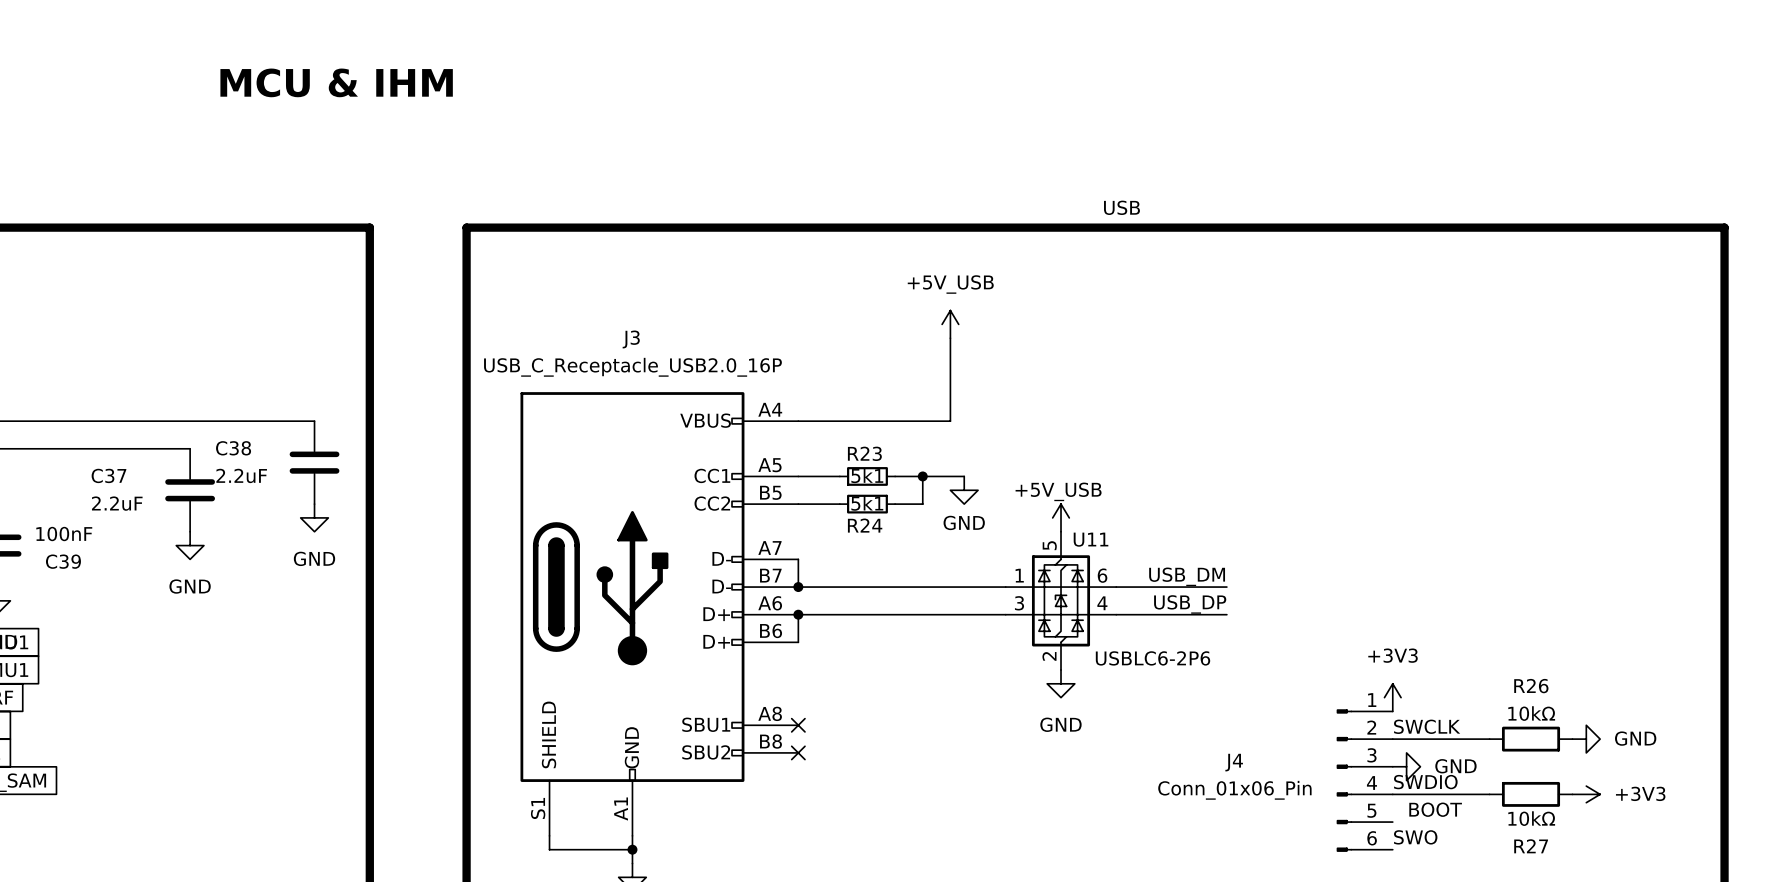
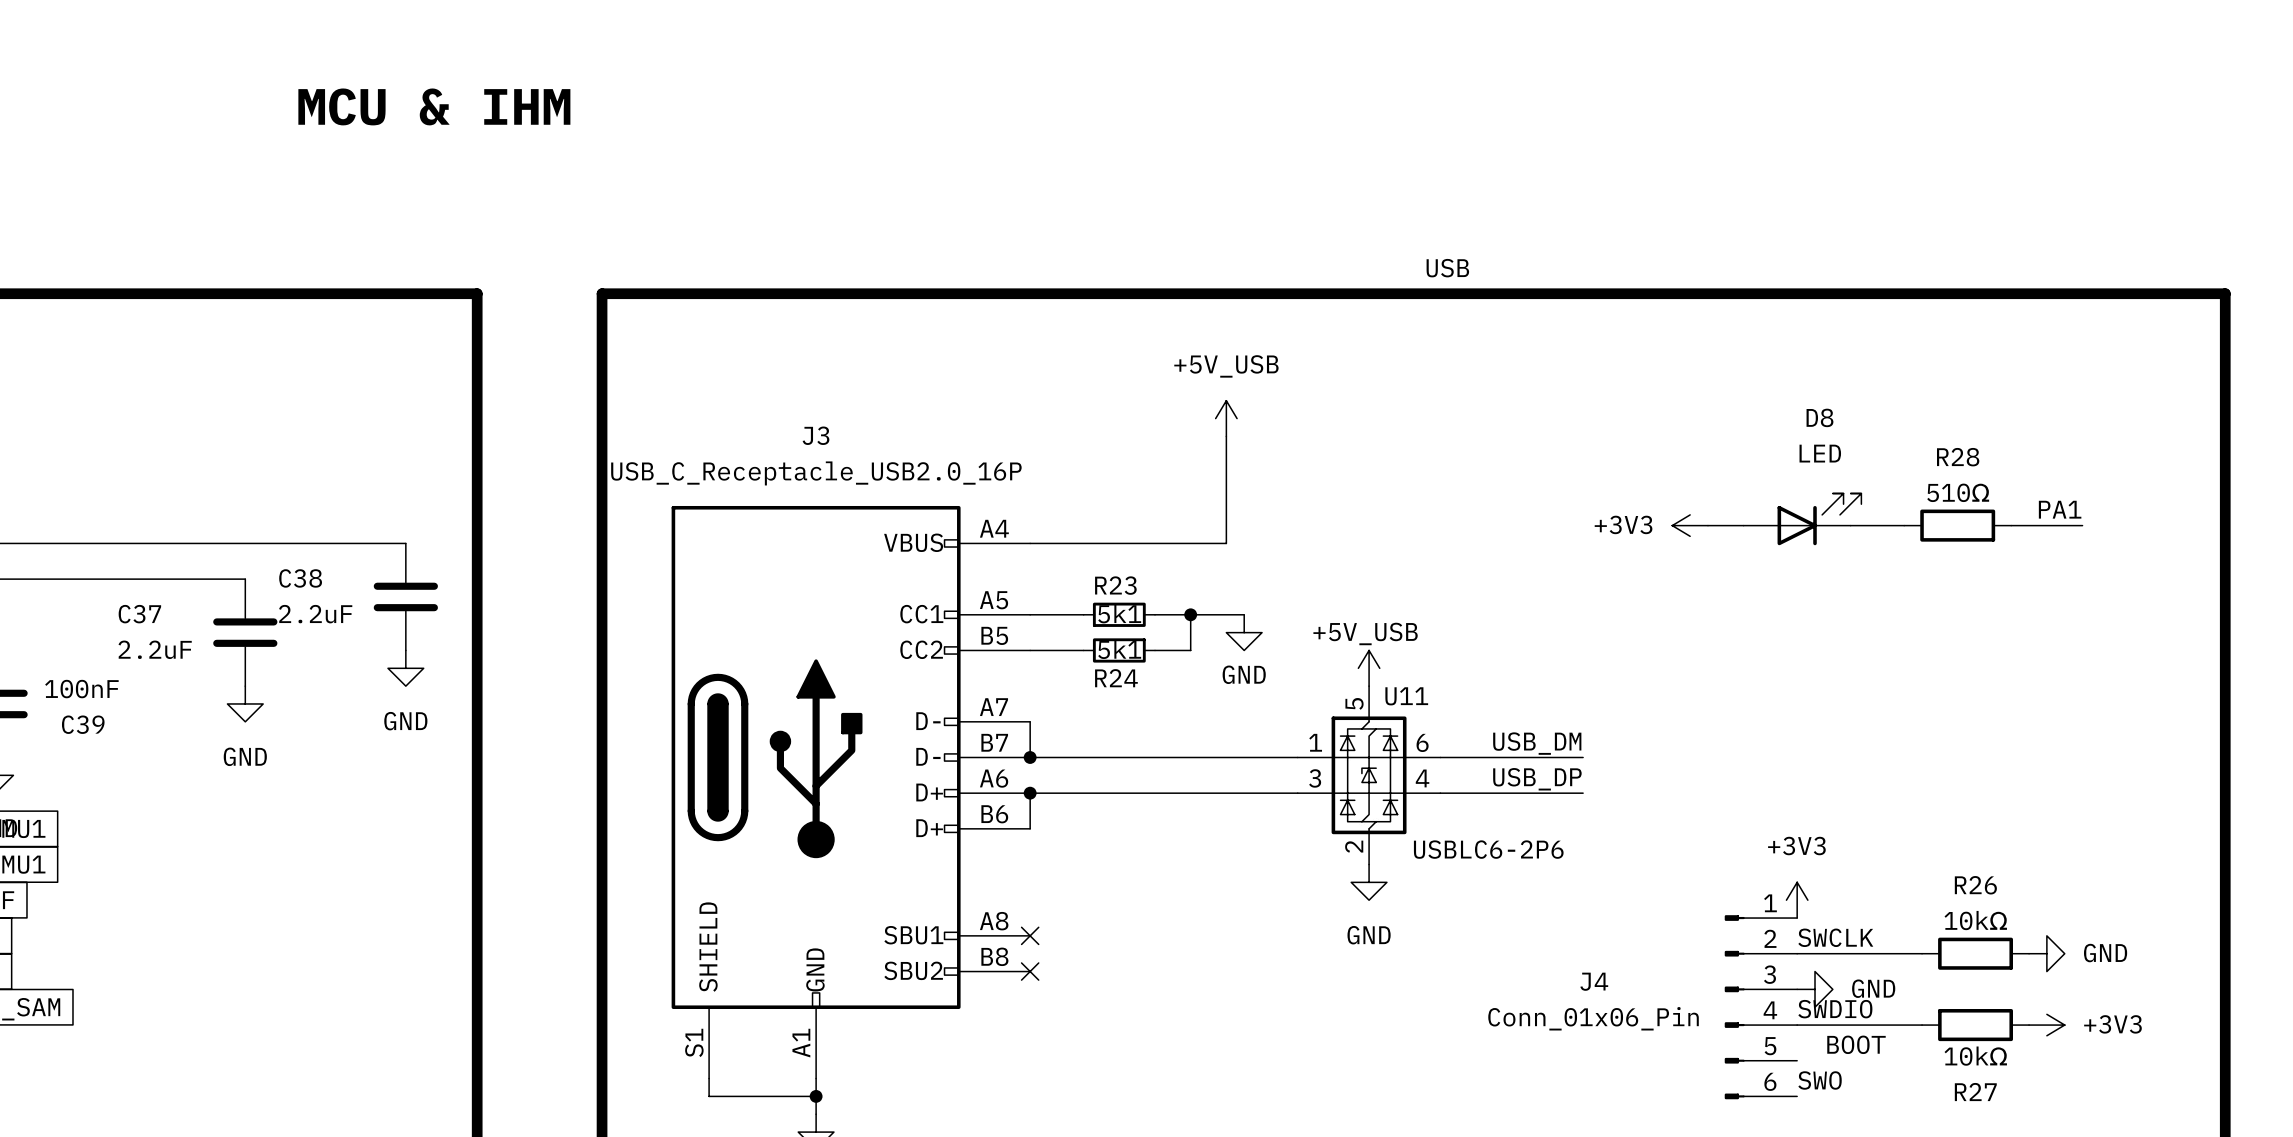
label: none -> PA1 (2060, 509)
D8: none -> LED (1802, 519)
power symbol: none -> +3V3 (1690, 525)
wire: none -> (1707, 525) (1743, 525)
wire: none -> (1850, 525) (1904, 525)
R28: none -> 510Ω (1957, 525)
wire: none -> (2011, 525) (2082, 525)

